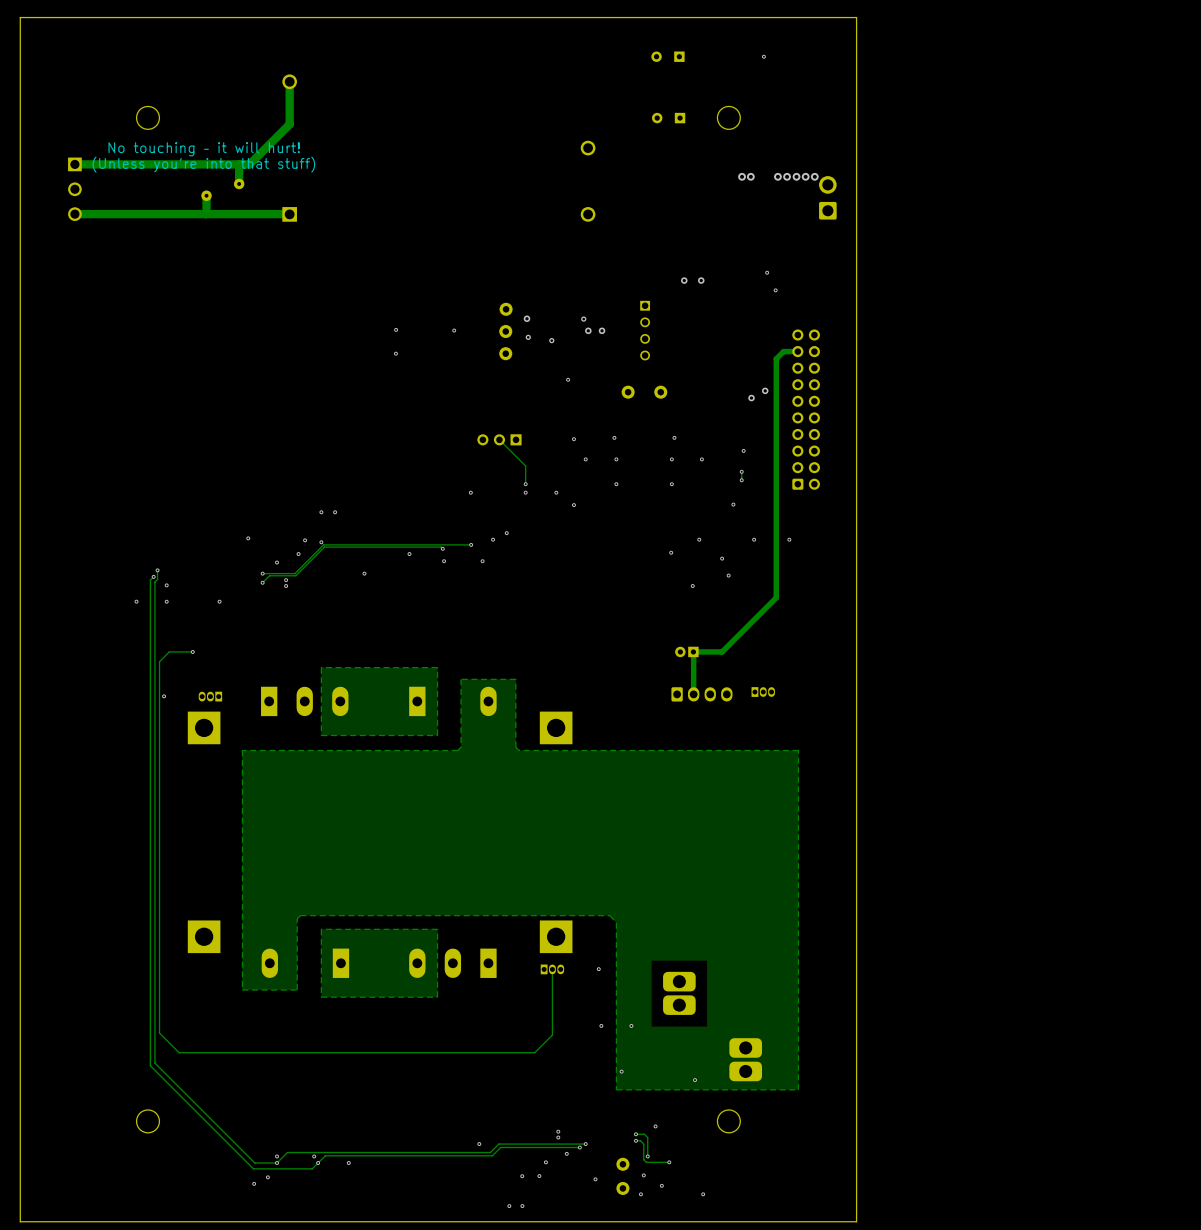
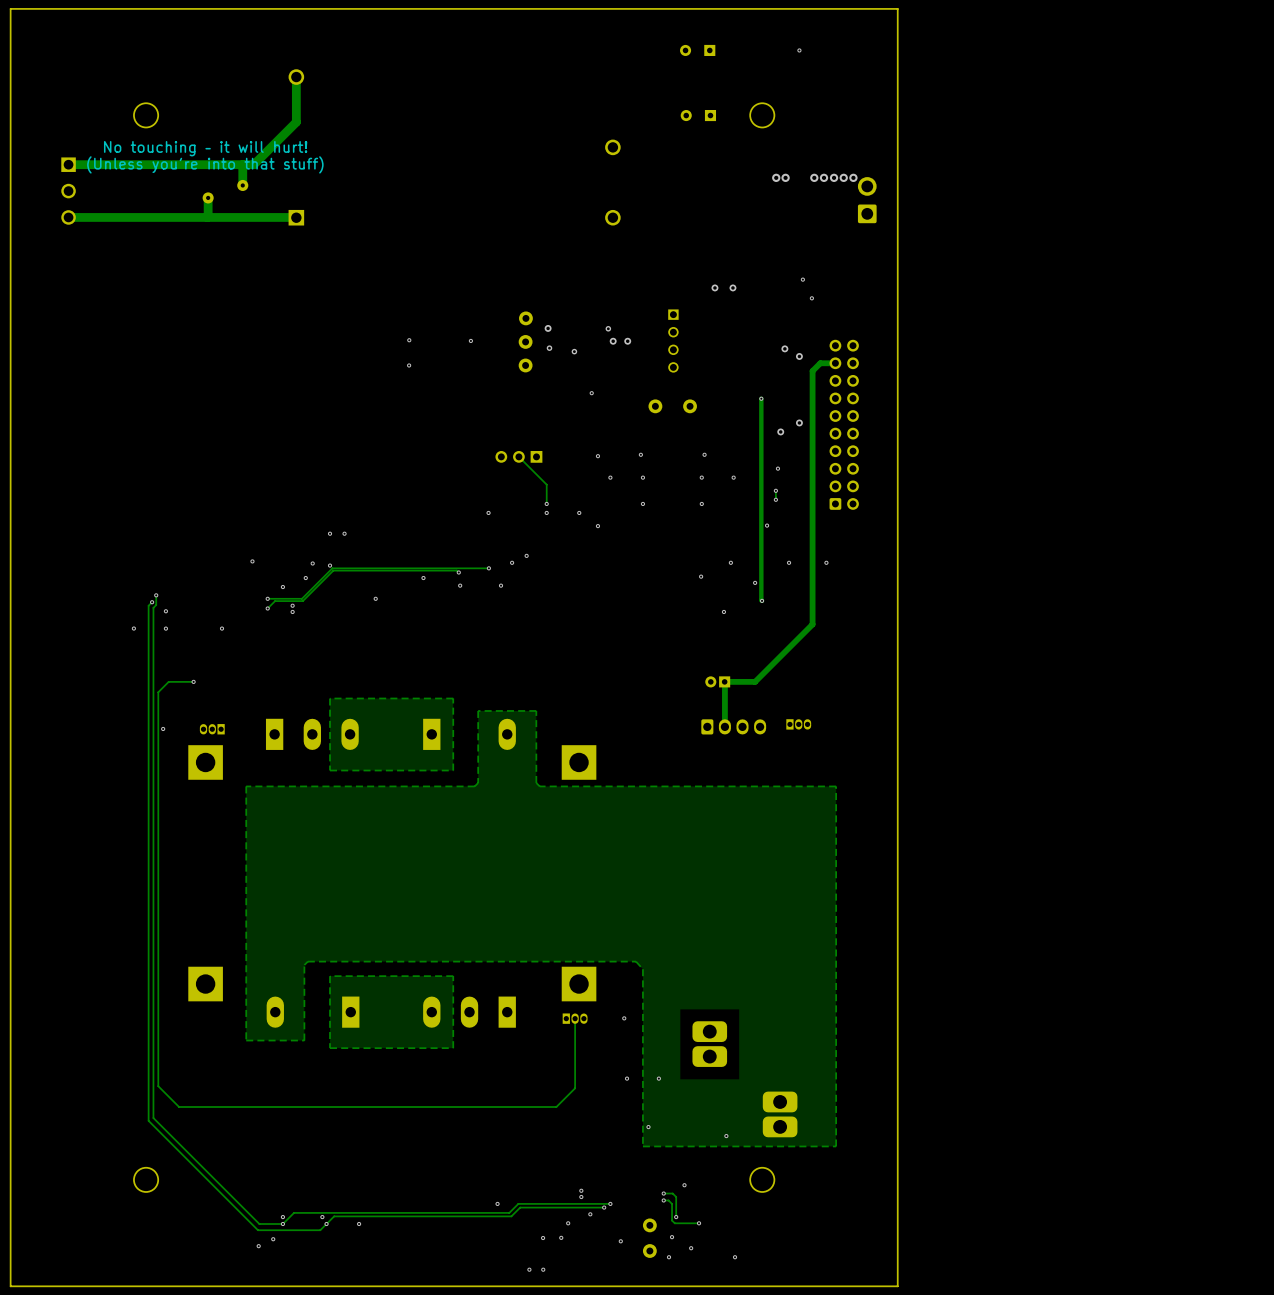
via: none -> (784, 348)
via: none -> (799, 356)
track: none -> (761, 398) (762, 600)
via: none -> (761, 398)
via: (765, 390) -> none
via: (751, 398) -> none
via: none -> (799, 422)
via: none -> (780, 431)

